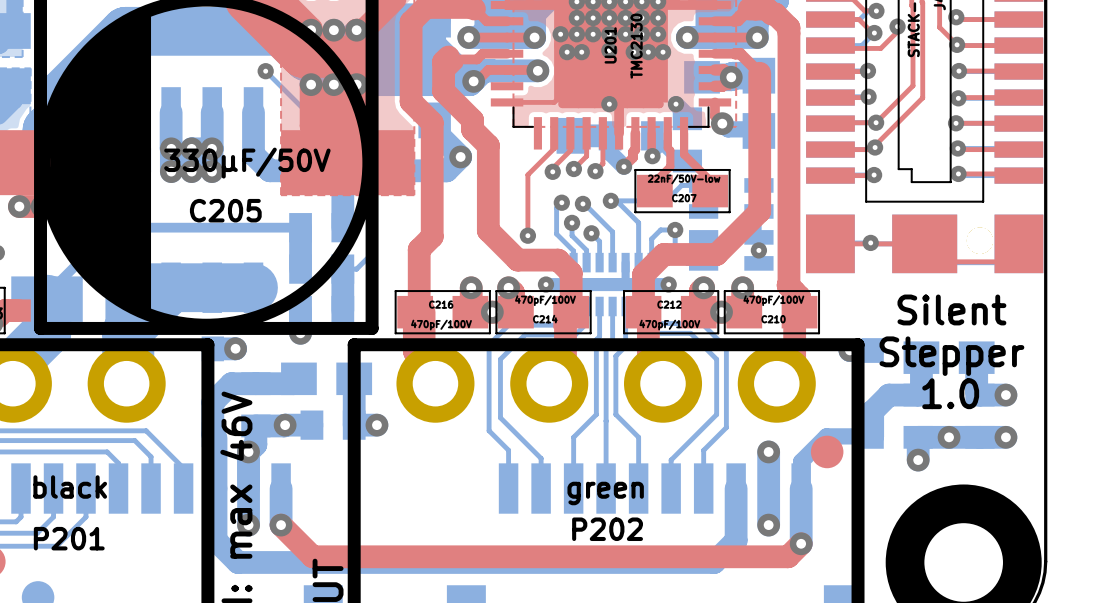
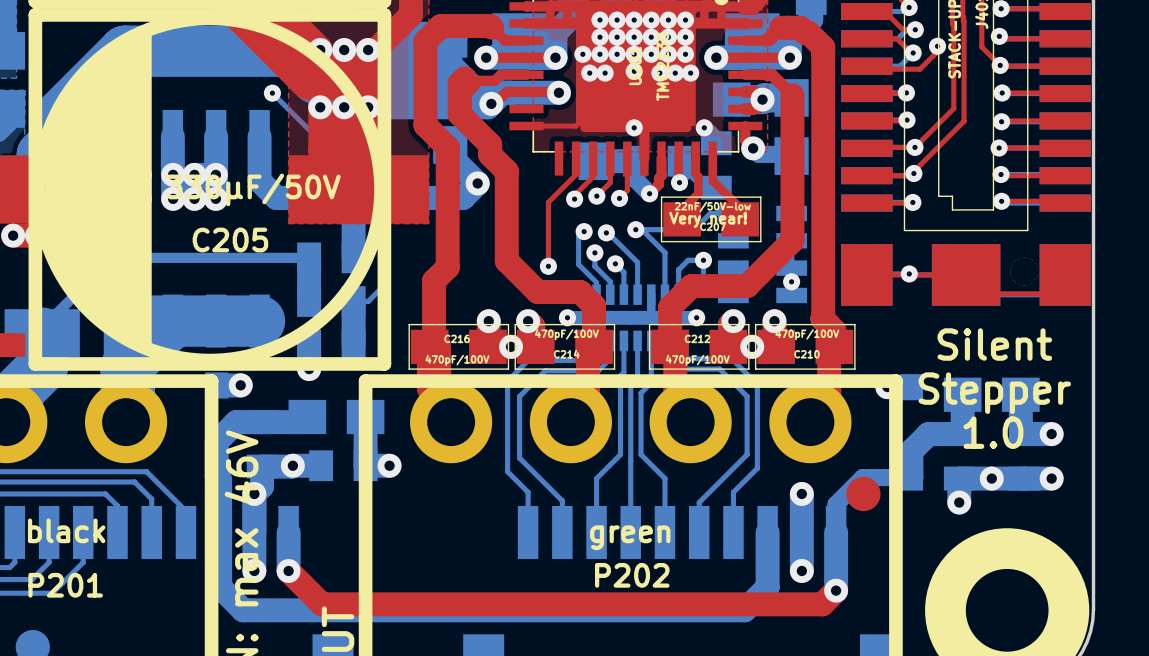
text: none -> Very near! (708, 219)

